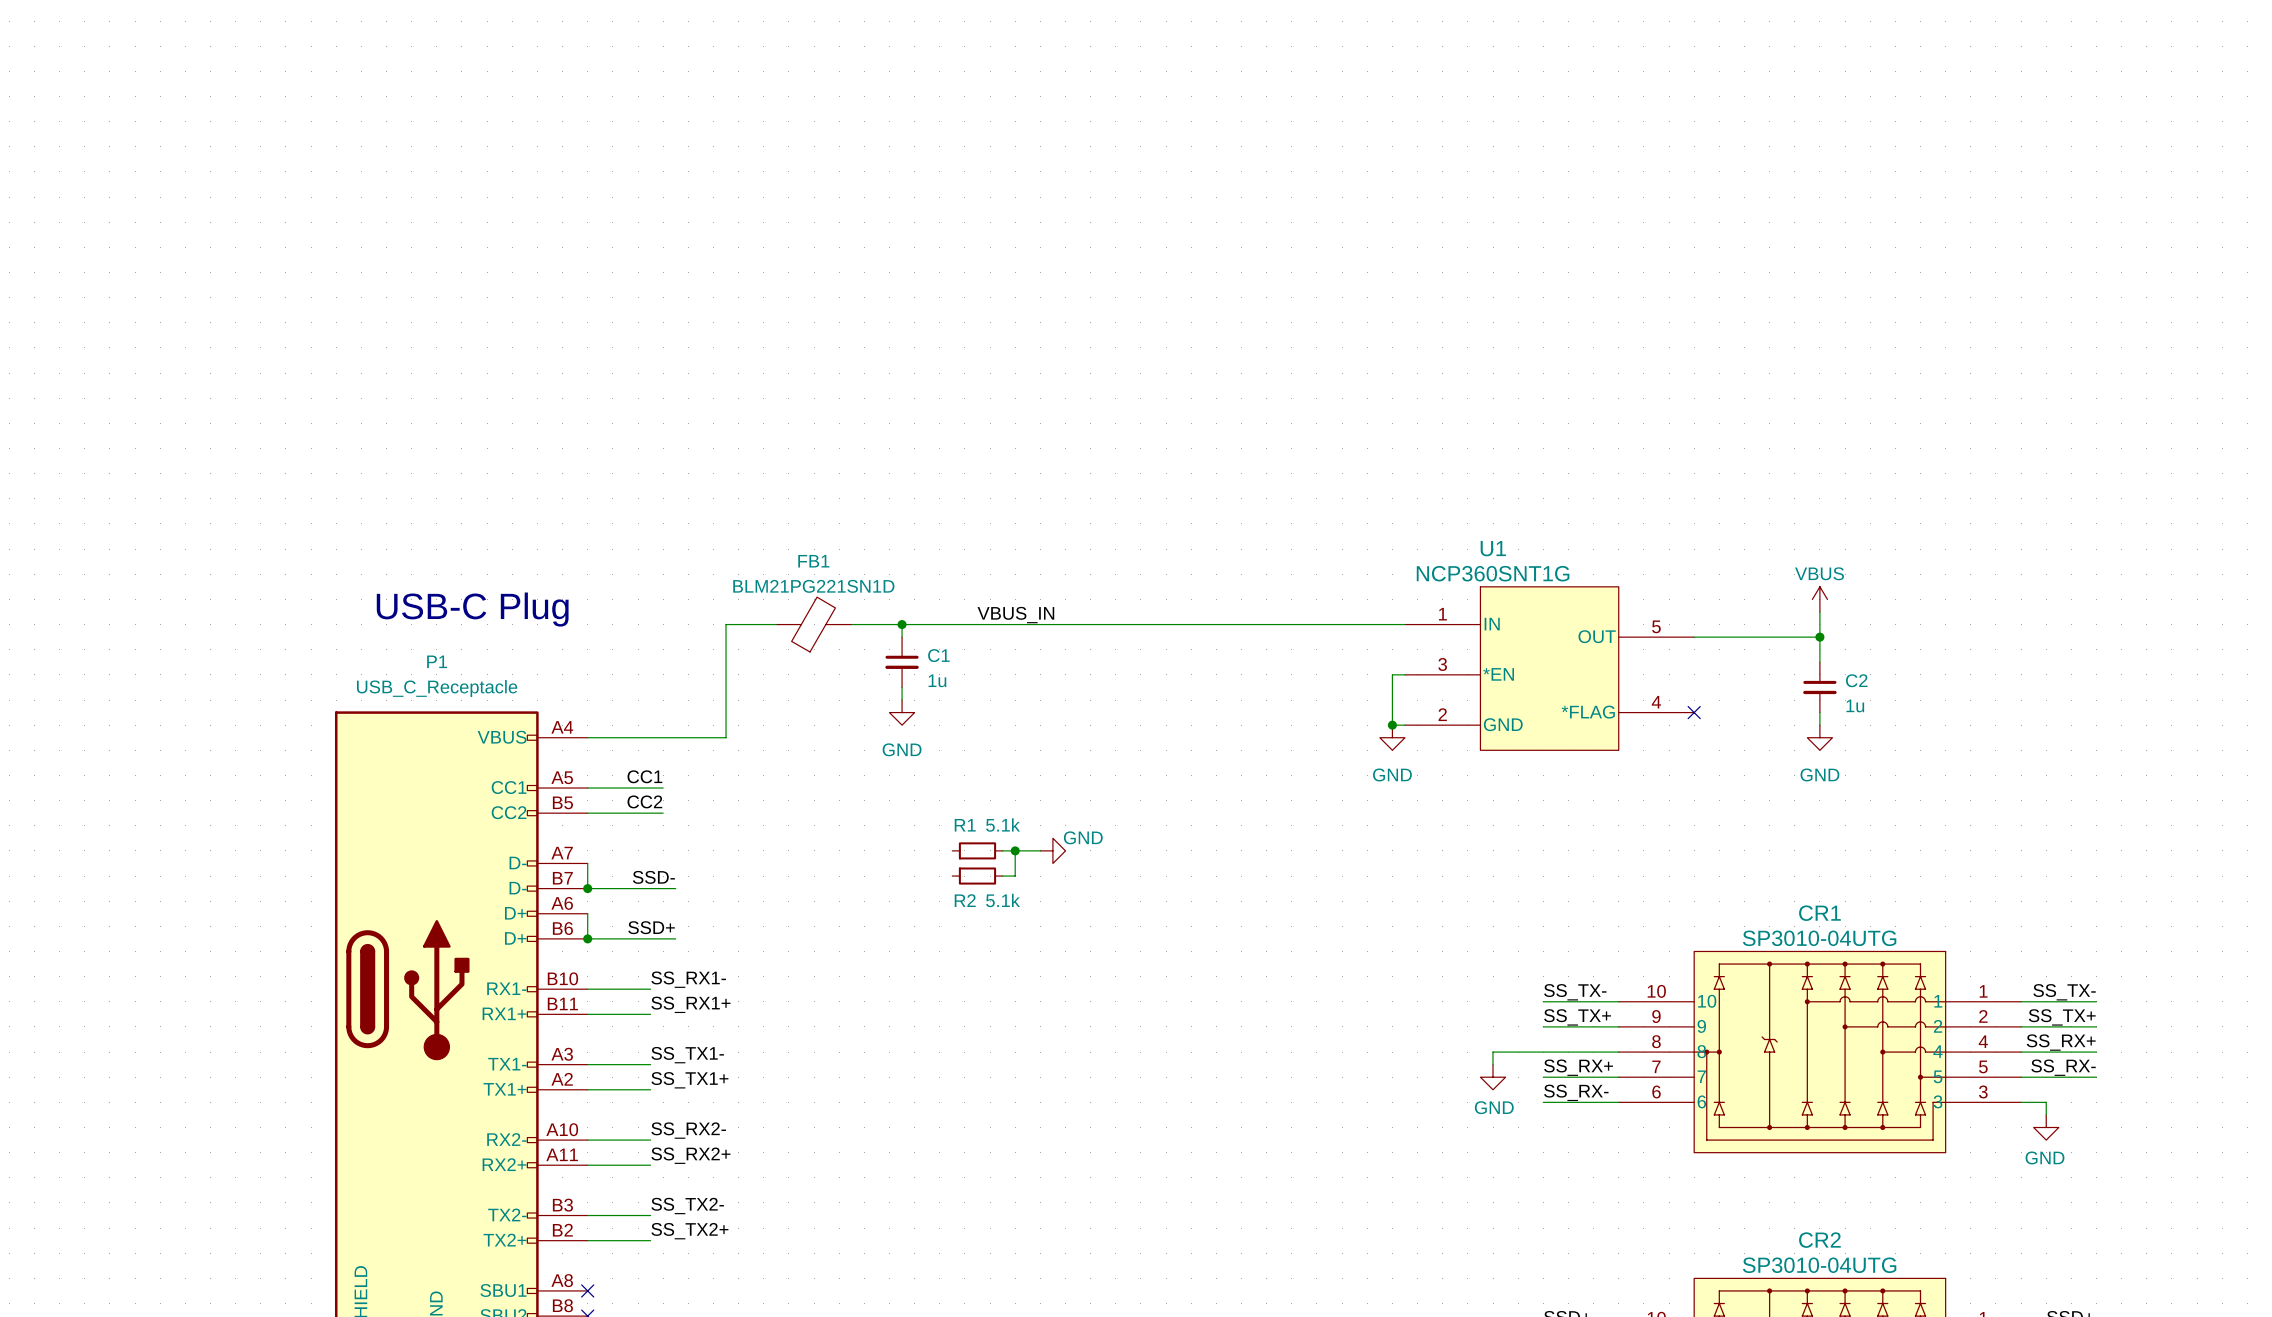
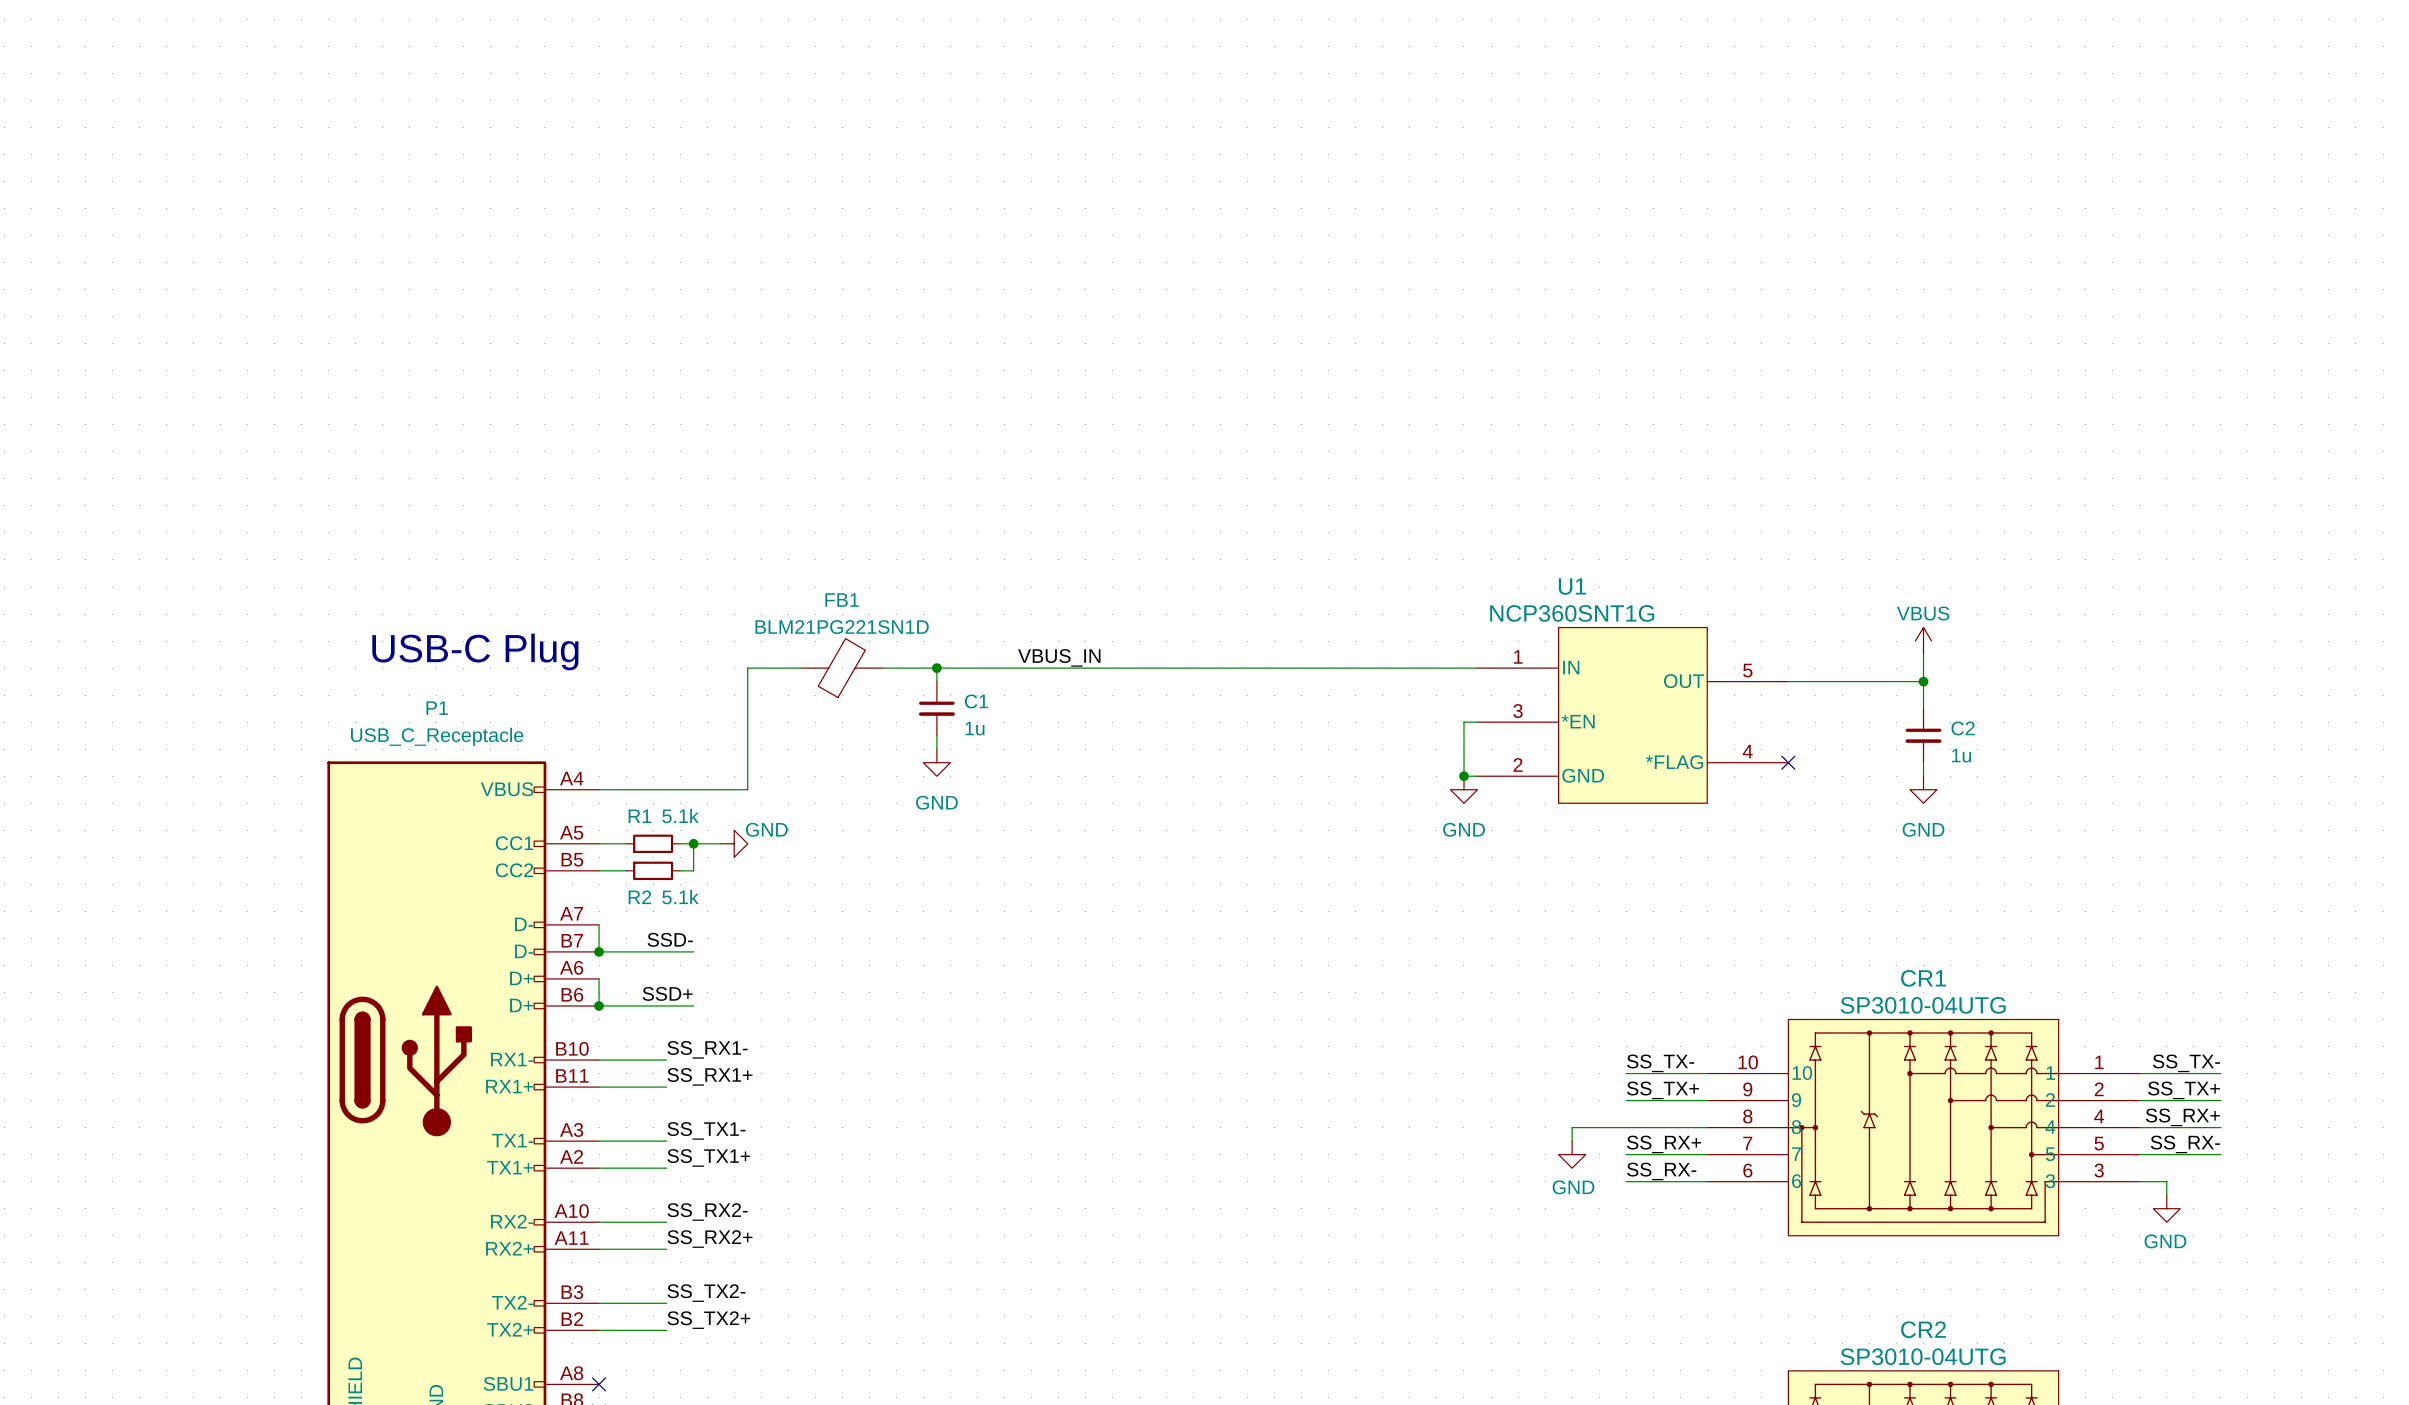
label: CC1 (644, 776) -> none
wire: (612, 788) (663, 788) -> (720, 843) (680, 843)
junction: none -> (693, 843)
power symbol: none -> GND (734, 843)
label: CC2 (644, 801) -> none
wire: (612, 813) (663, 813) -> (693, 843) (693, 870) (680, 870)
R1 position: (977, 850) -> (653, 843)
wire: (1002, 850) (1040, 850) -> none
wire: (1015, 850) (1015, 876) (1002, 876) -> none
junction: (1015, 850) -> none
power symbol: GND (1052, 850) -> none
R2 position: (977, 876) -> (653, 870)

